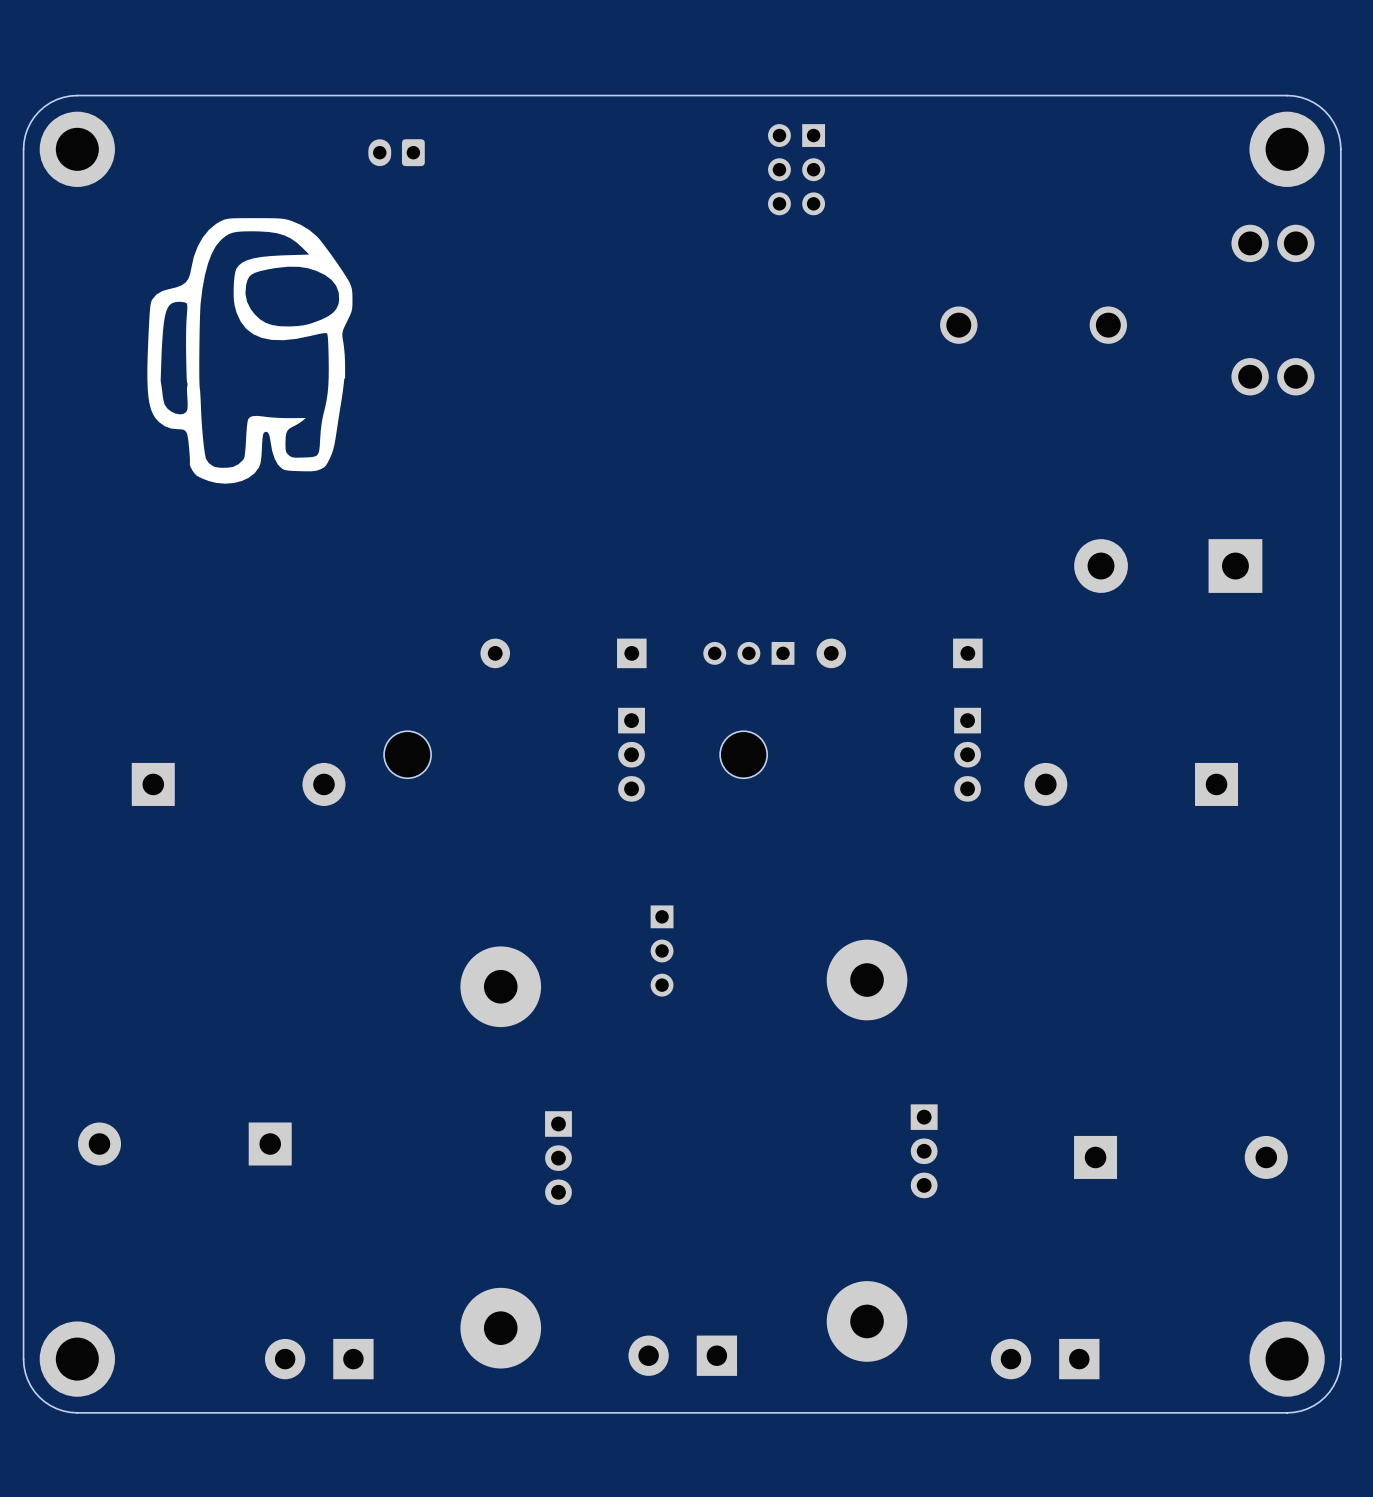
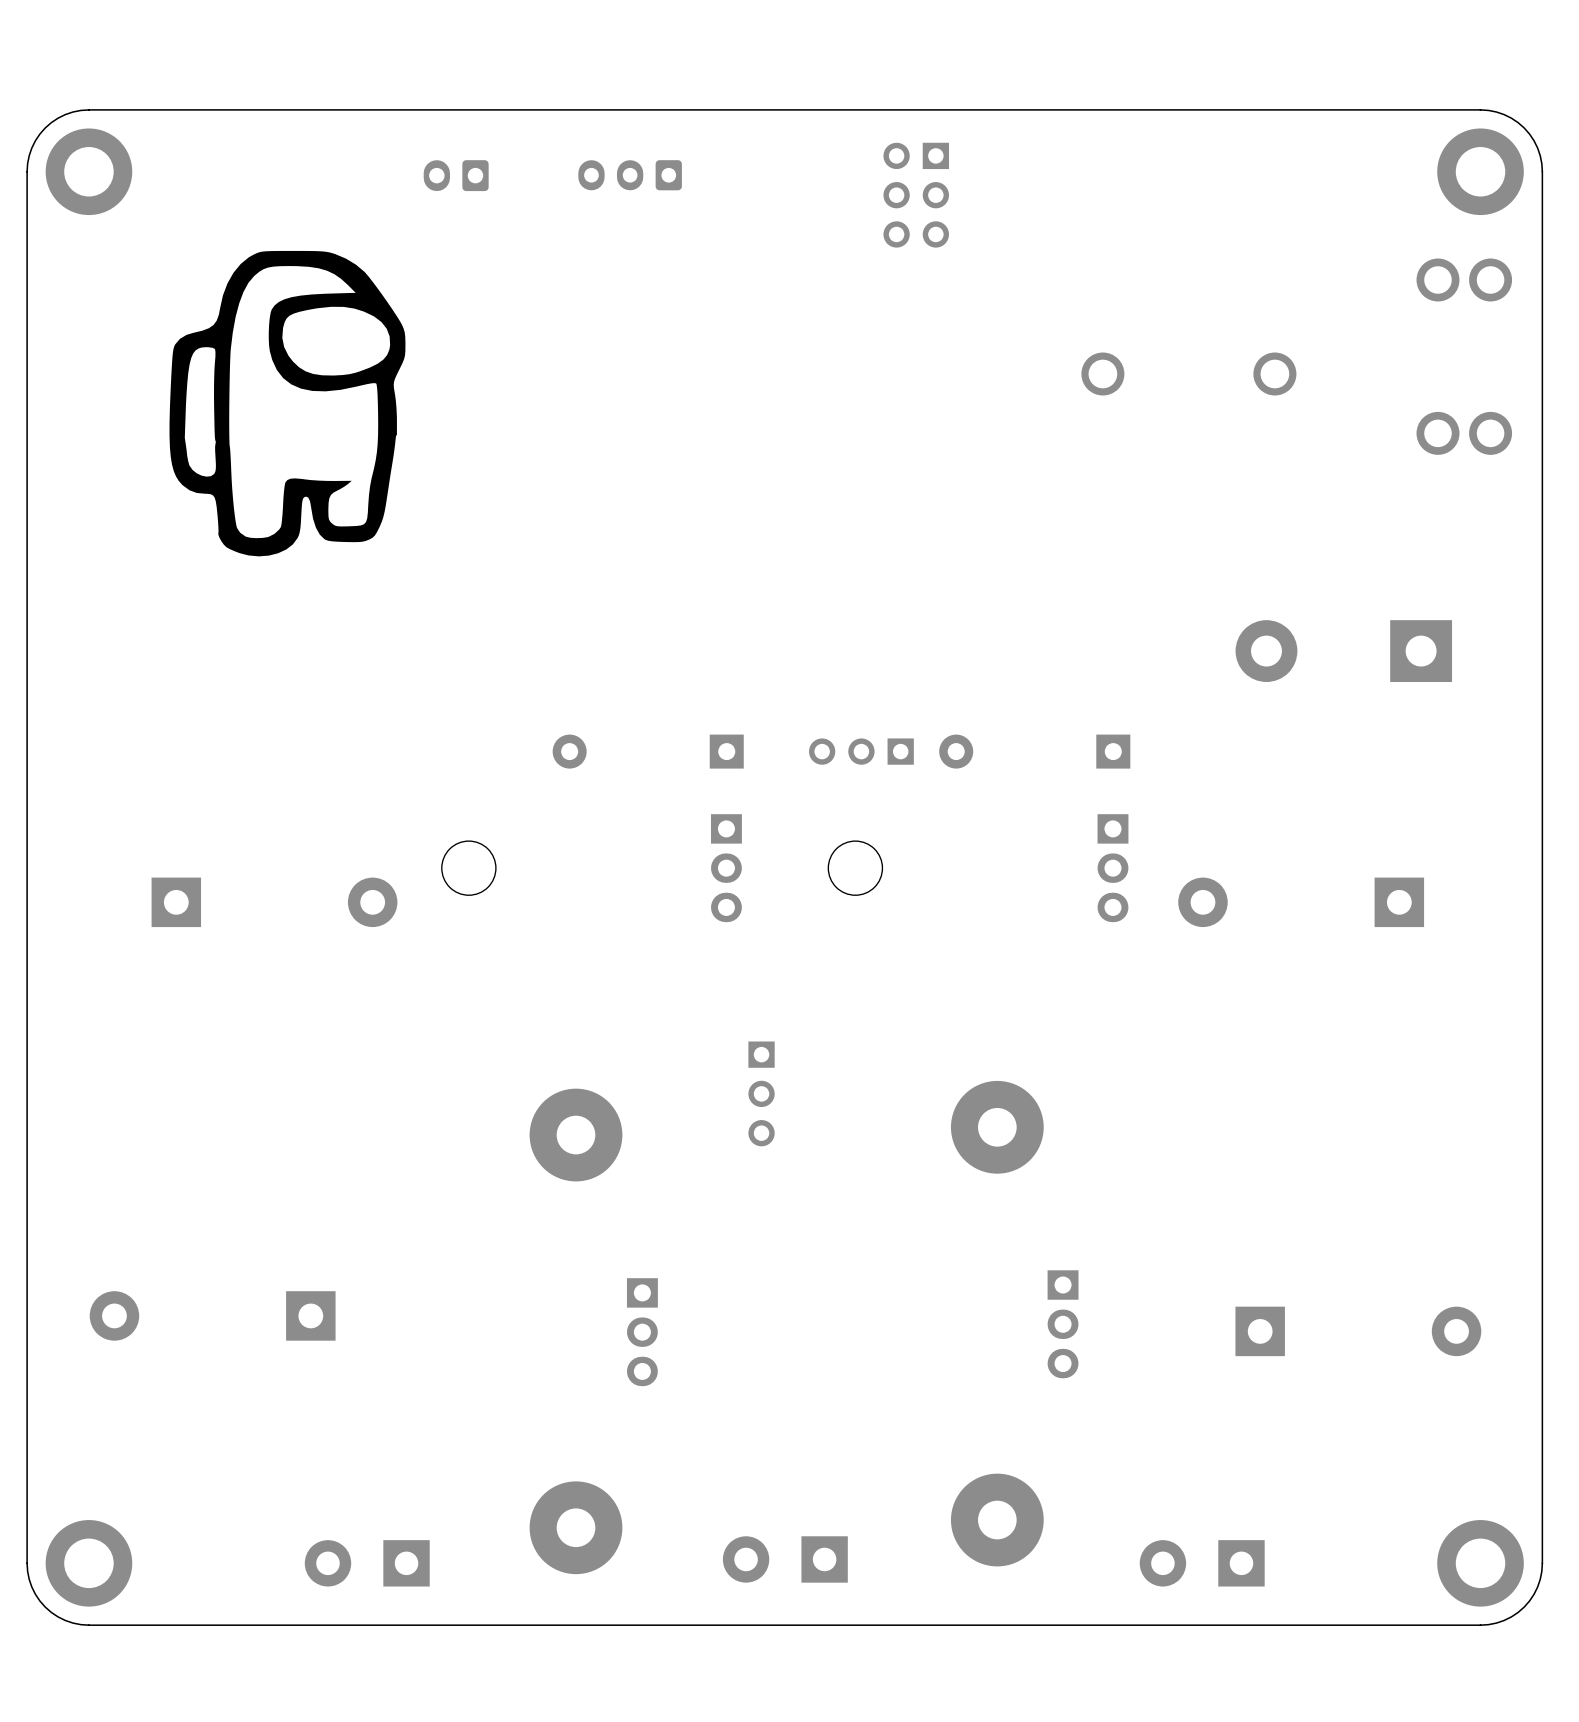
part: none -> (630, 175)

